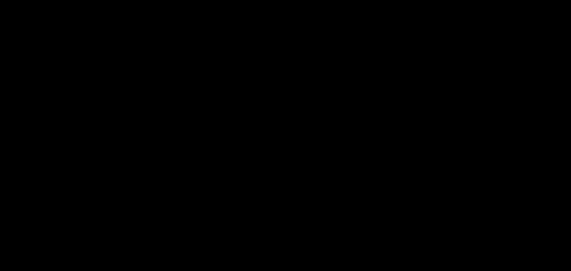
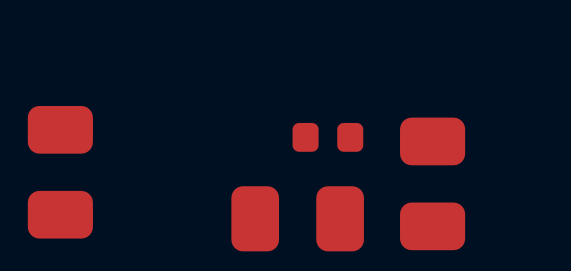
part: none -> (327, 137)
part: none -> (60, 172)
part: none -> (432, 183)
part: none -> (297, 218)

